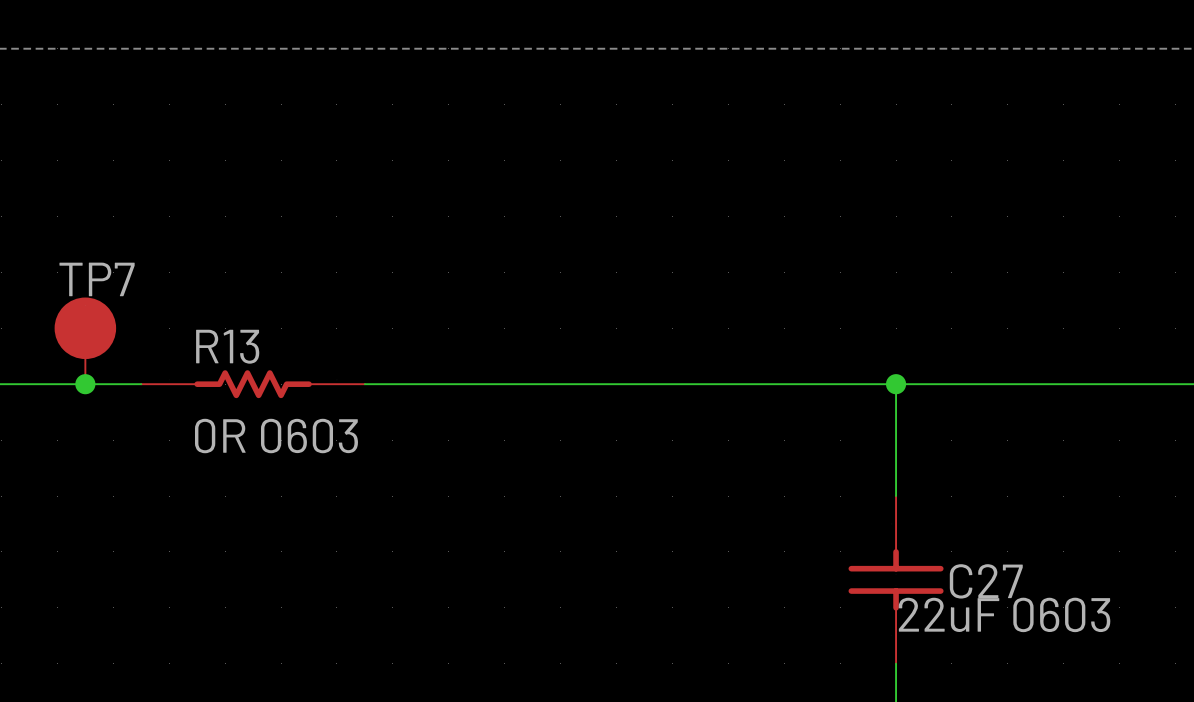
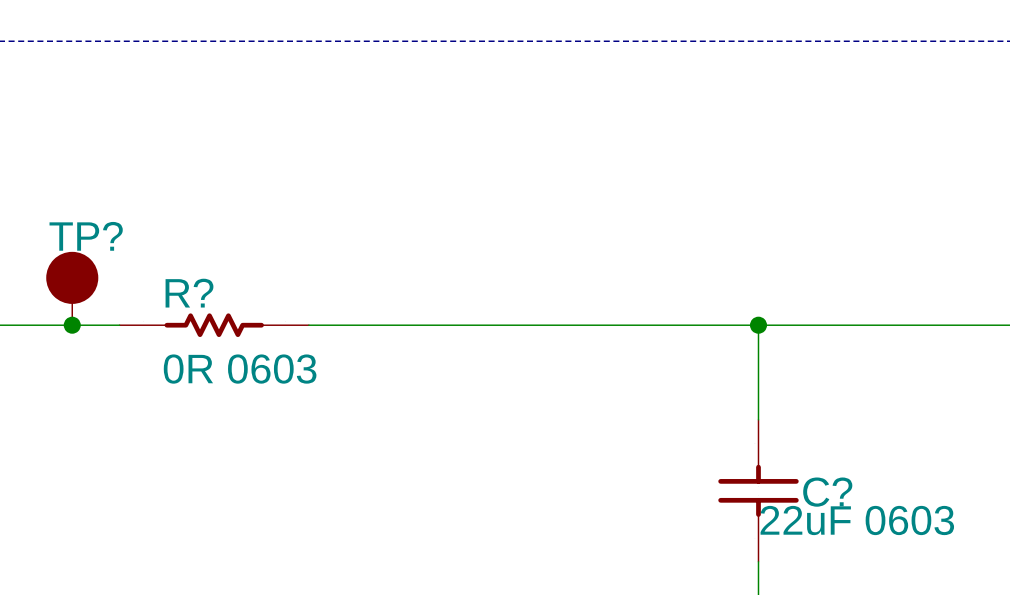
TP7 name: TP7 (97, 279) -> TP? (86, 236)
R13 name: R13 (227, 346) -> R? (189, 293)
C27 name: C27 (986, 581) -> C? (827, 492)

